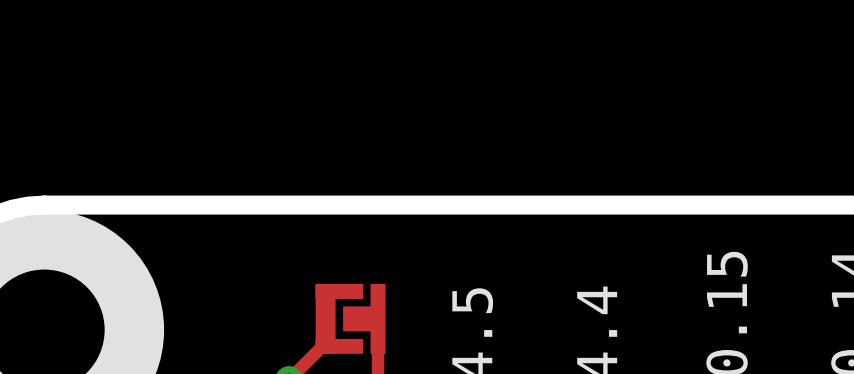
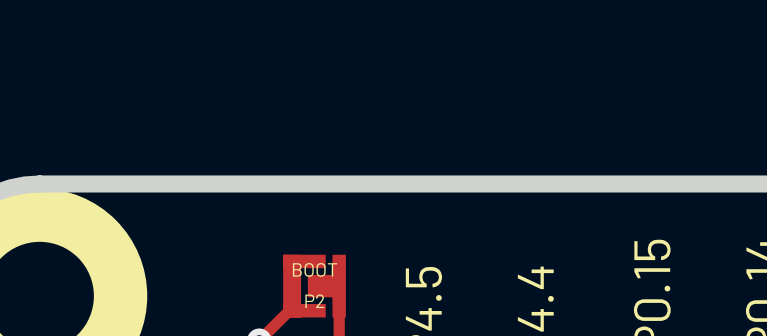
P2 value: none -> BOOT (315, 269)
P2 name: none -> P2 (314, 301)

